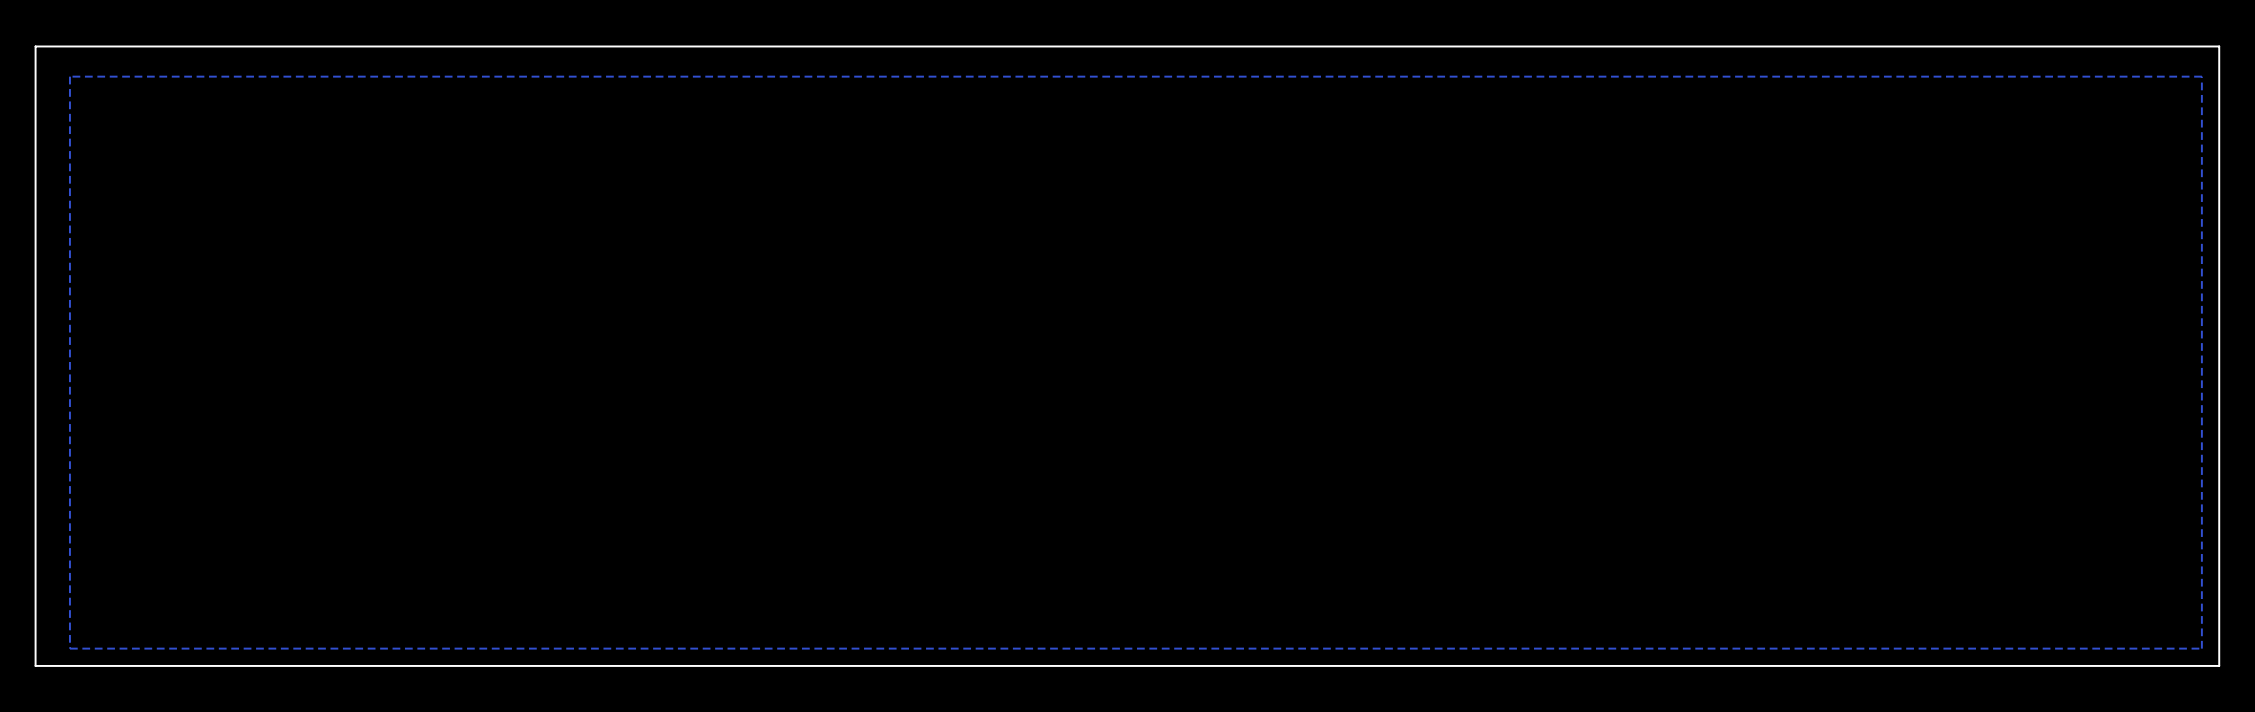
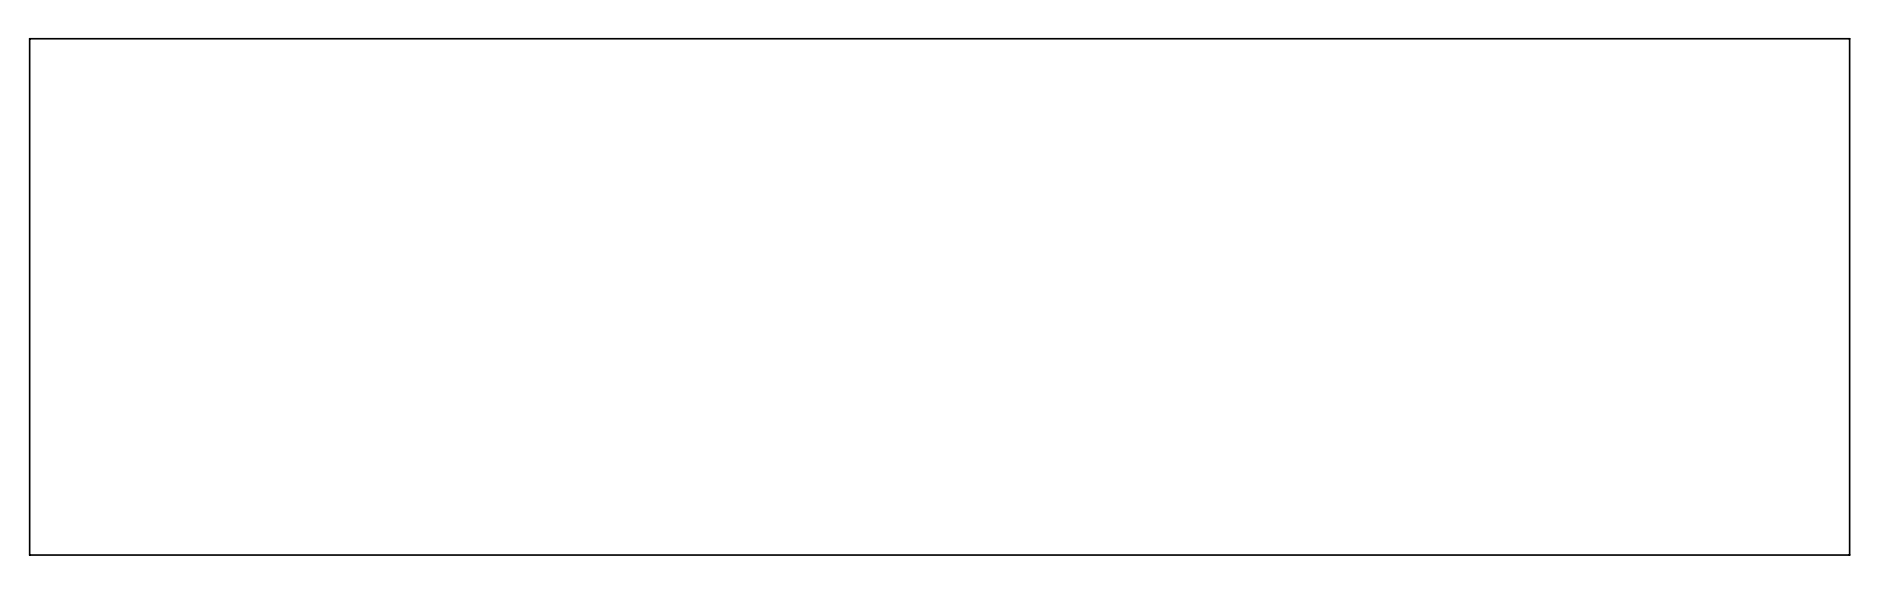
zone outline: (2201, 76) (69, 76) (69, 648) (2201, 648) (2201, 76) -> none

